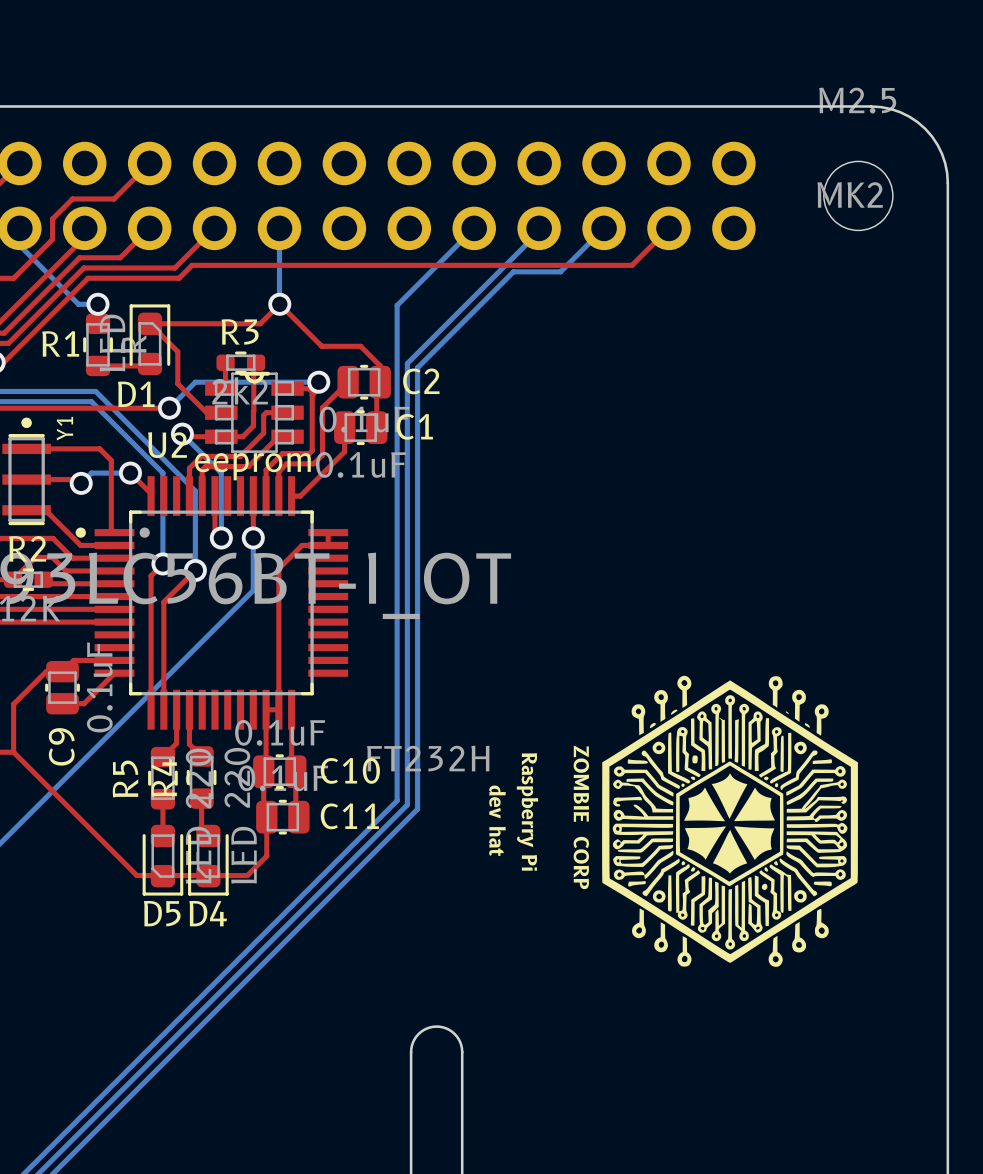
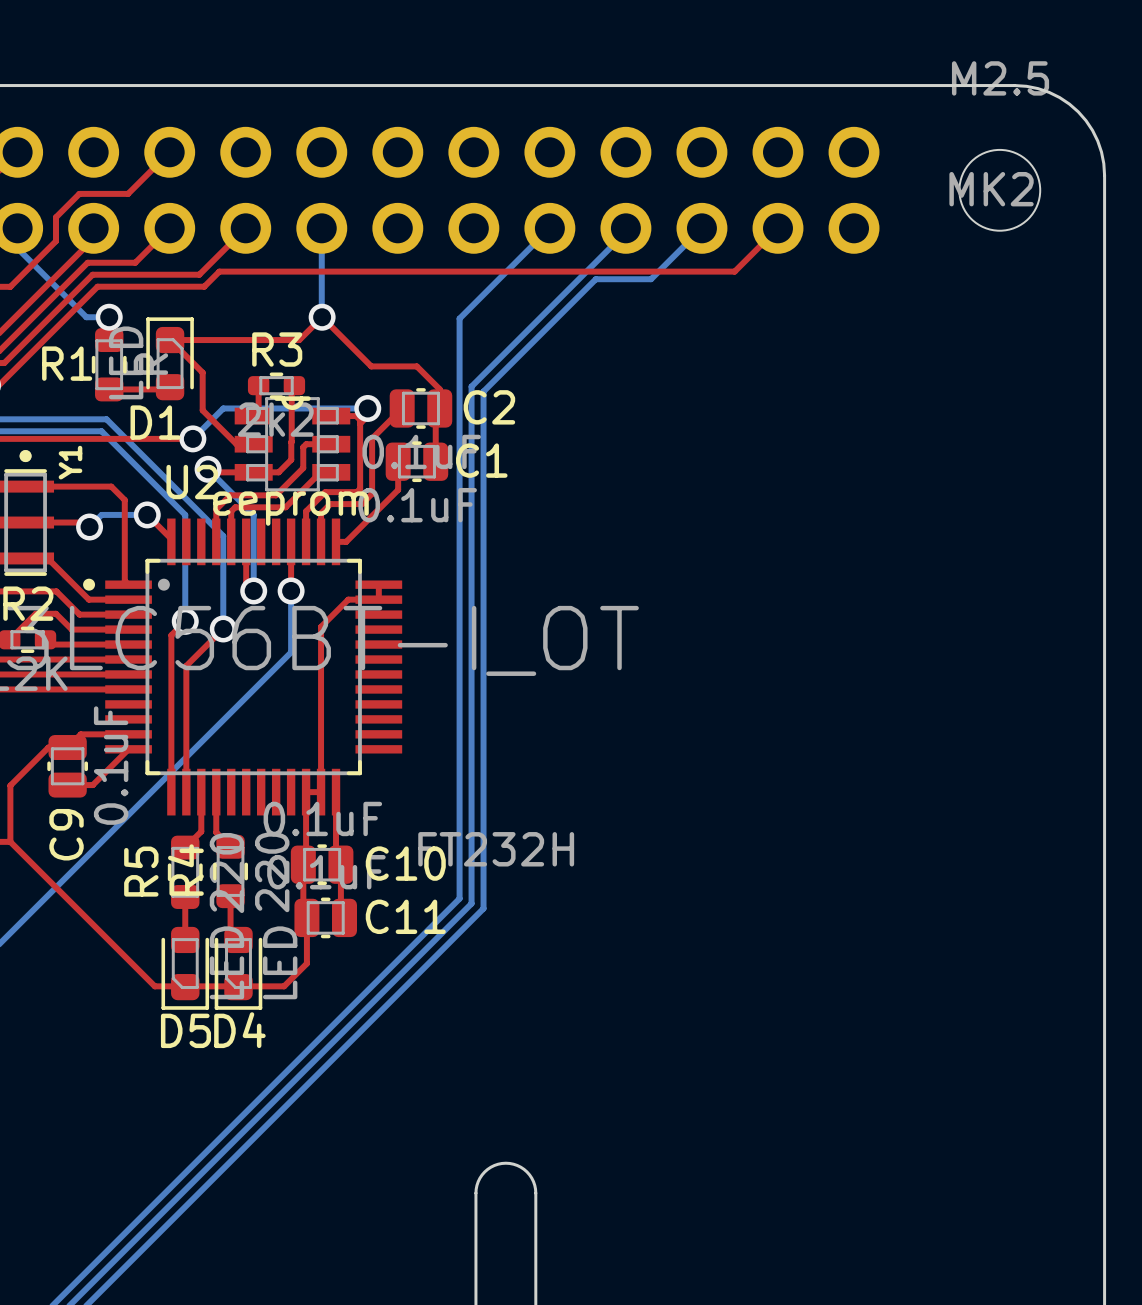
drawing: [602, 675, 858, 967] -> none
text: ZOMBIE (581, 783) -> none
text: Raspberry Pi (527, 811) -> none
text: dev hat (497, 820) -> none
text: CORP (581, 862) -> none

